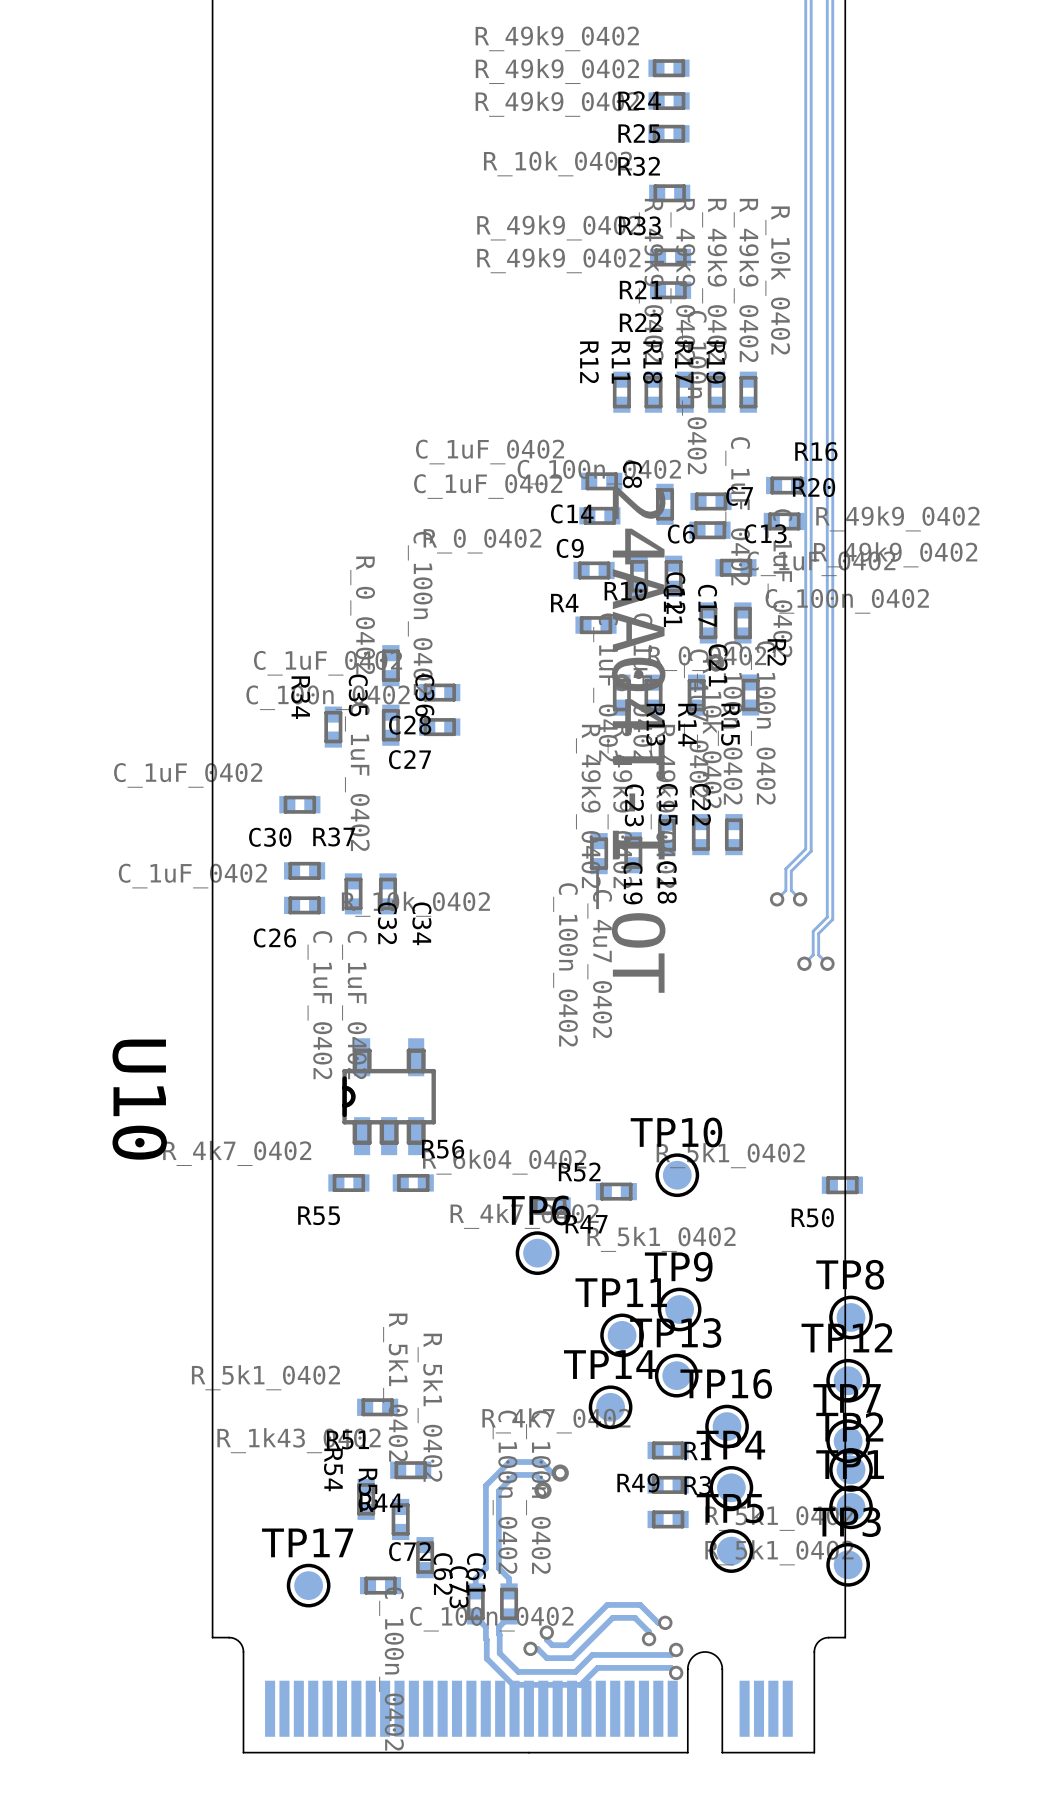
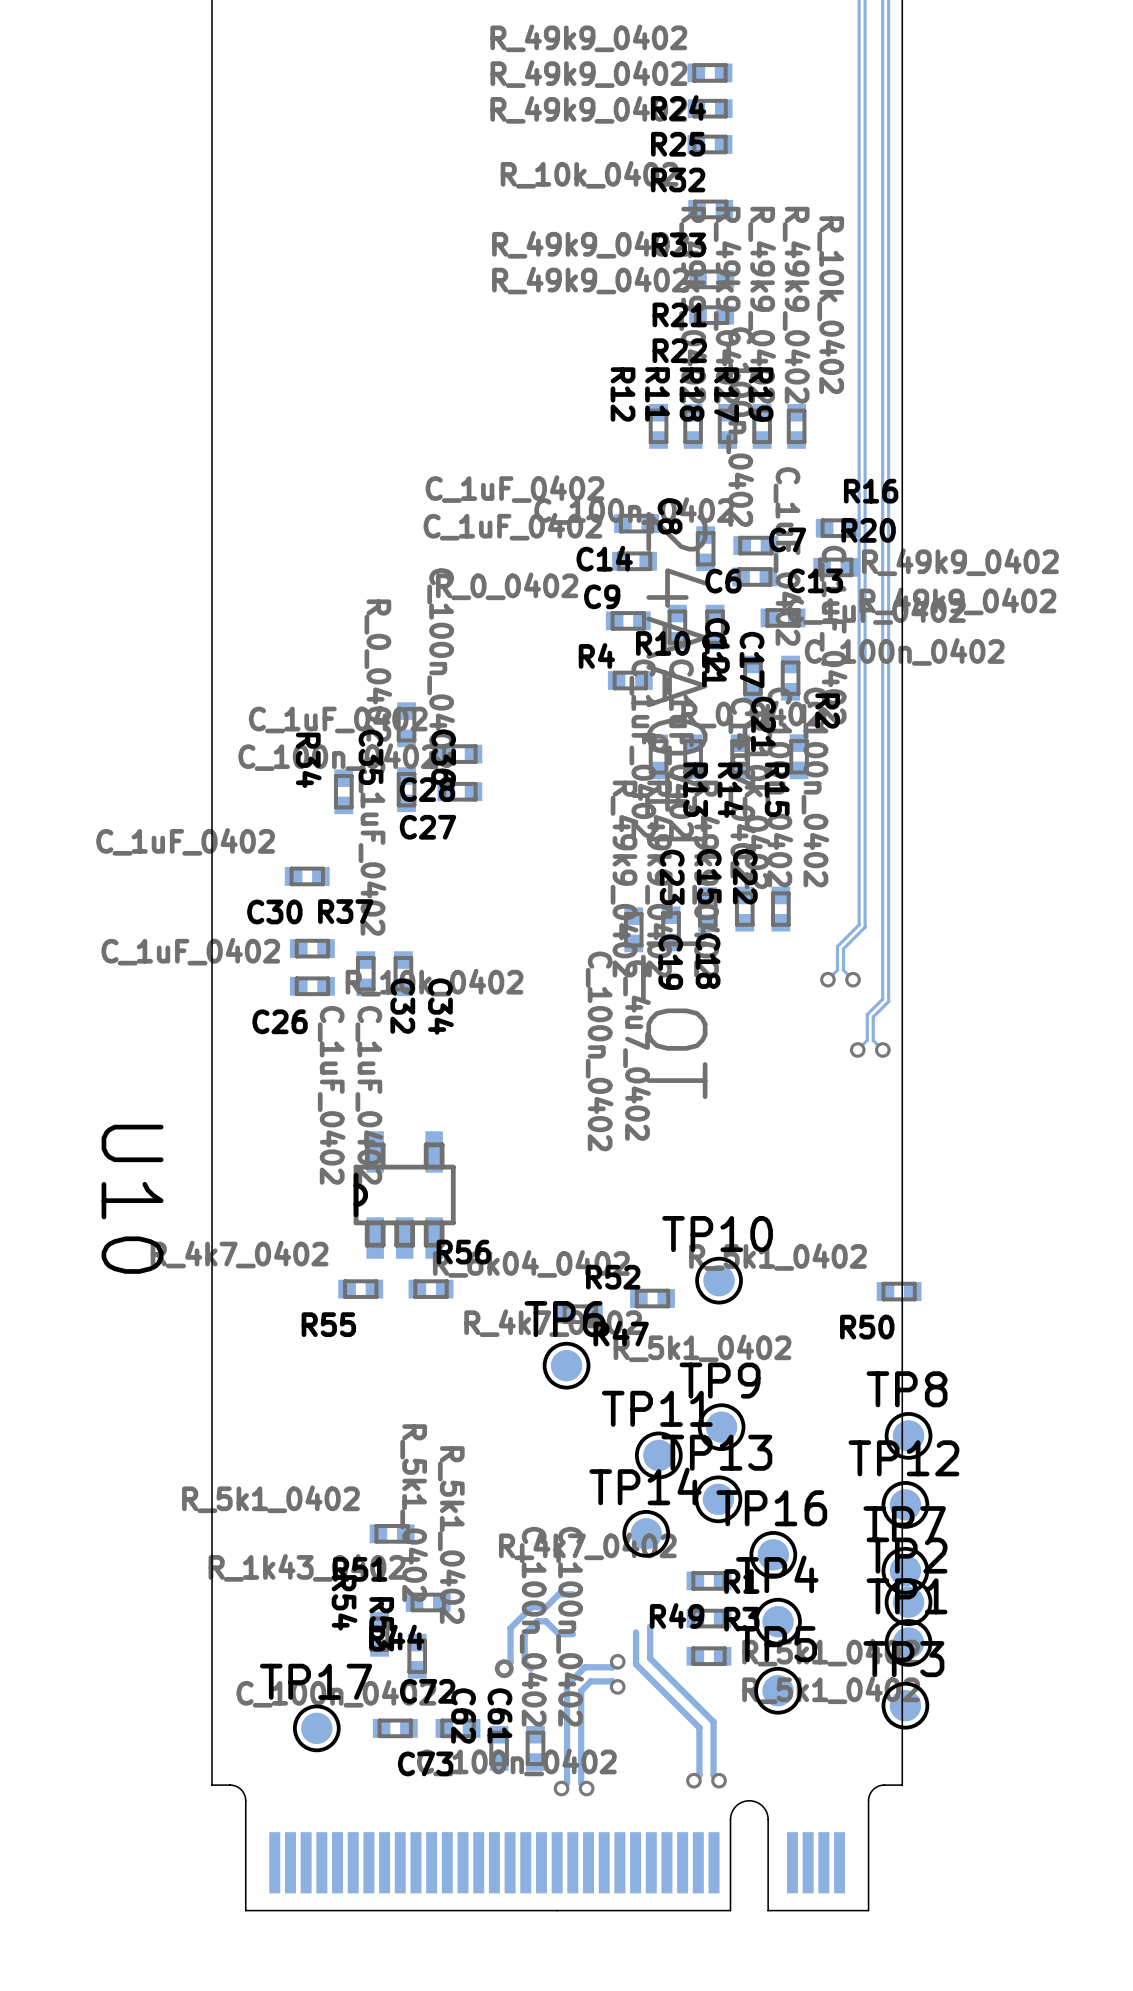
track: none -> (572, 1594) (558, 1594) (546, 1607) (531, 1607) (510, 1628) (510, 1662) (504, 1668)
track: (560, 1473) (552, 1473) (541, 1462) (509, 1462) (485, 1485) (485, 1568) (475, 1578) (475, 1591) -> none
via: (560, 1473) -> none
track: (542, 1490) (542, 1482) (535, 1474) (514, 1474) (498, 1491) (498, 1568) (509, 1578) (509, 1591) -> none
via: (542, 1490) -> none
track: none -> (650, 1626) (650, 1658) (713, 1721) (713, 1775) (719, 1780)
track: none -> (636, 1632) (636, 1664) (699, 1727) (699, 1775) (693, 1780)
track: none -> (572, 1634) (558, 1634) (546, 1621) (537, 1621) (524, 1633) (524, 1662) (530, 1668)
track: none -> (617, 1661) (612, 1667) (584, 1667) (567, 1685) (567, 1783) (561, 1788)
via: none -> (617, 1661)
via: none -> (504, 1668)
track: none -> (617, 1686) (612, 1681) (590, 1681) (581, 1691) (581, 1783) (586, 1788)
via: none -> (617, 1686)
C73 rotation: 0° (425, 1557) -> 90° clockwise (458, 1728)
C73 position: (425, 1557) -> (458, 1728)
track: (475, 1617) (485, 1627) (486, 1658) (513, 1684) (580, 1684) (597, 1667) (671, 1667) (676, 1672) -> none
track: (509, 1617) (498, 1627) (499, 1653) (518, 1671) (575, 1671) (592, 1654) (671, 1654) (676, 1649) -> none
track: (665, 1622) (658, 1622) (640, 1604) (607, 1604) (567, 1645) (552, 1645) (546, 1639) (546, 1632) -> none
via: (665, 1622) -> none
via: (546, 1632) -> none
via: none -> (693, 1780)
via: none -> (719, 1780)
track: (649, 1639) (649, 1631) (634, 1617) (612, 1617) (572, 1658) (546, 1658) (537, 1648) (530, 1648) -> none
via: (649, 1639) -> none
via: none -> (561, 1788)
via: none -> (586, 1788)
via: (530, 1648) -> none
via: (676, 1649) -> none
via: (676, 1672) -> none

